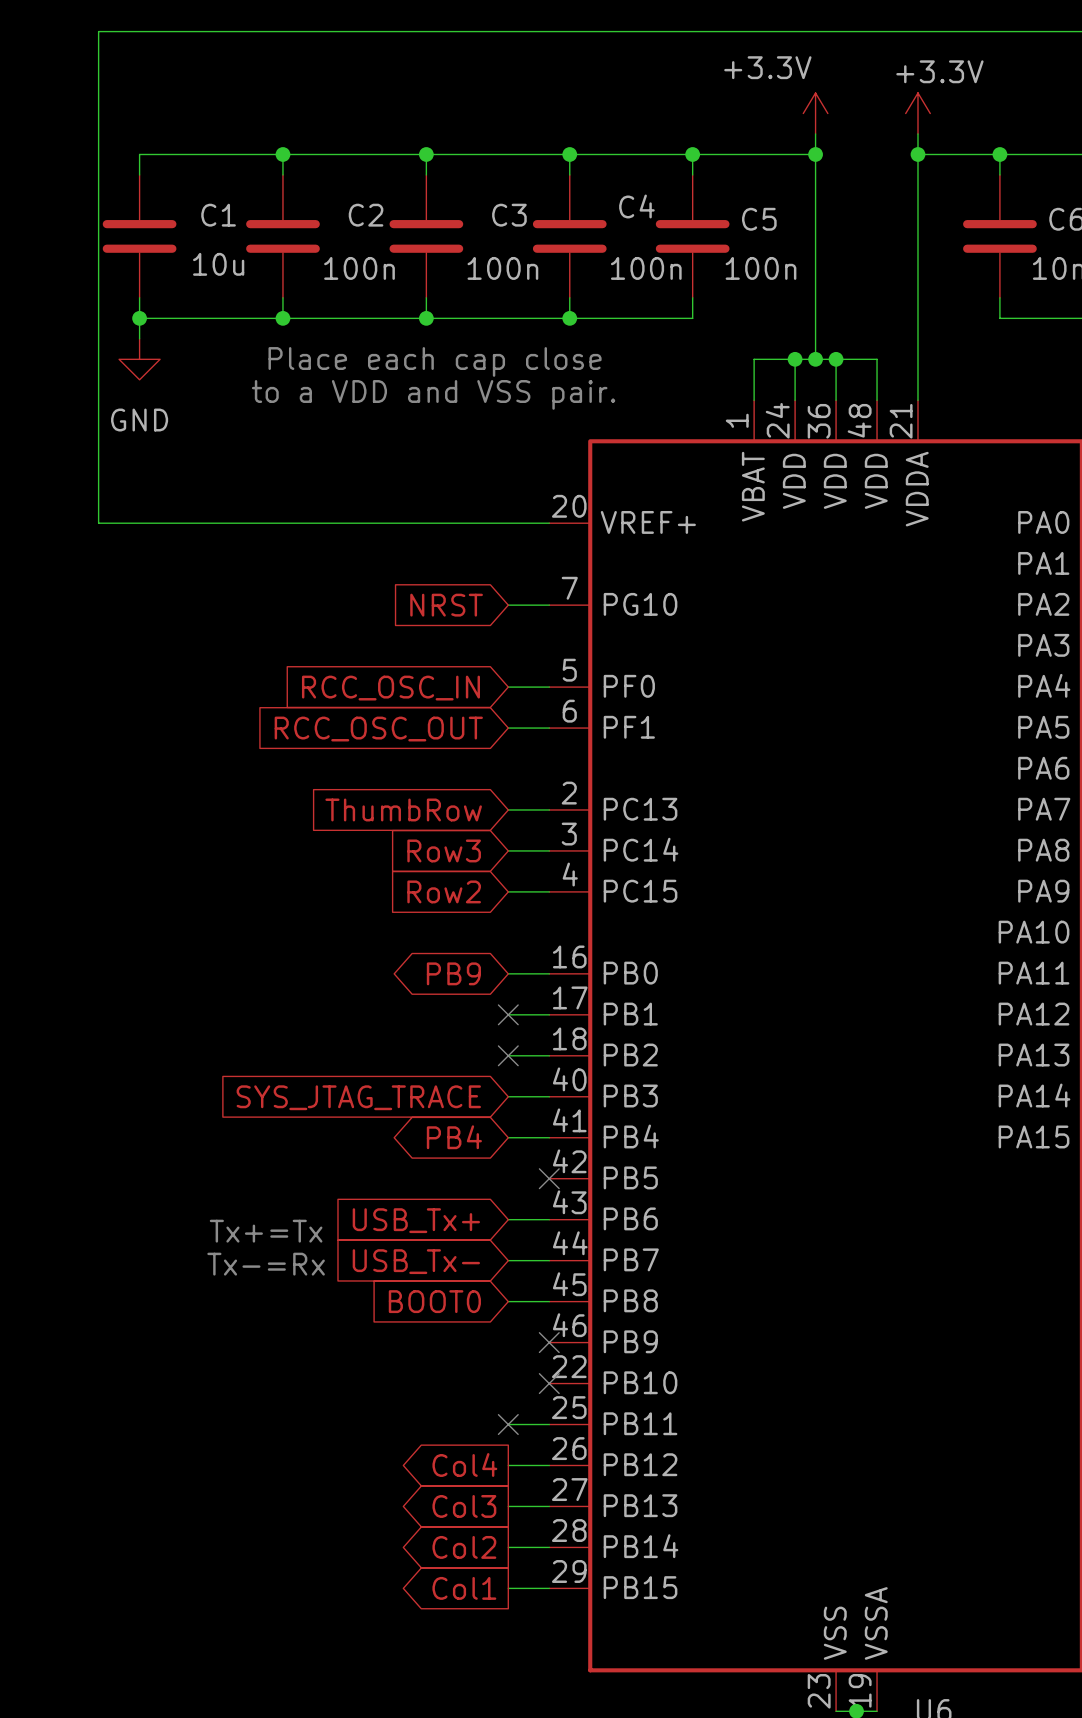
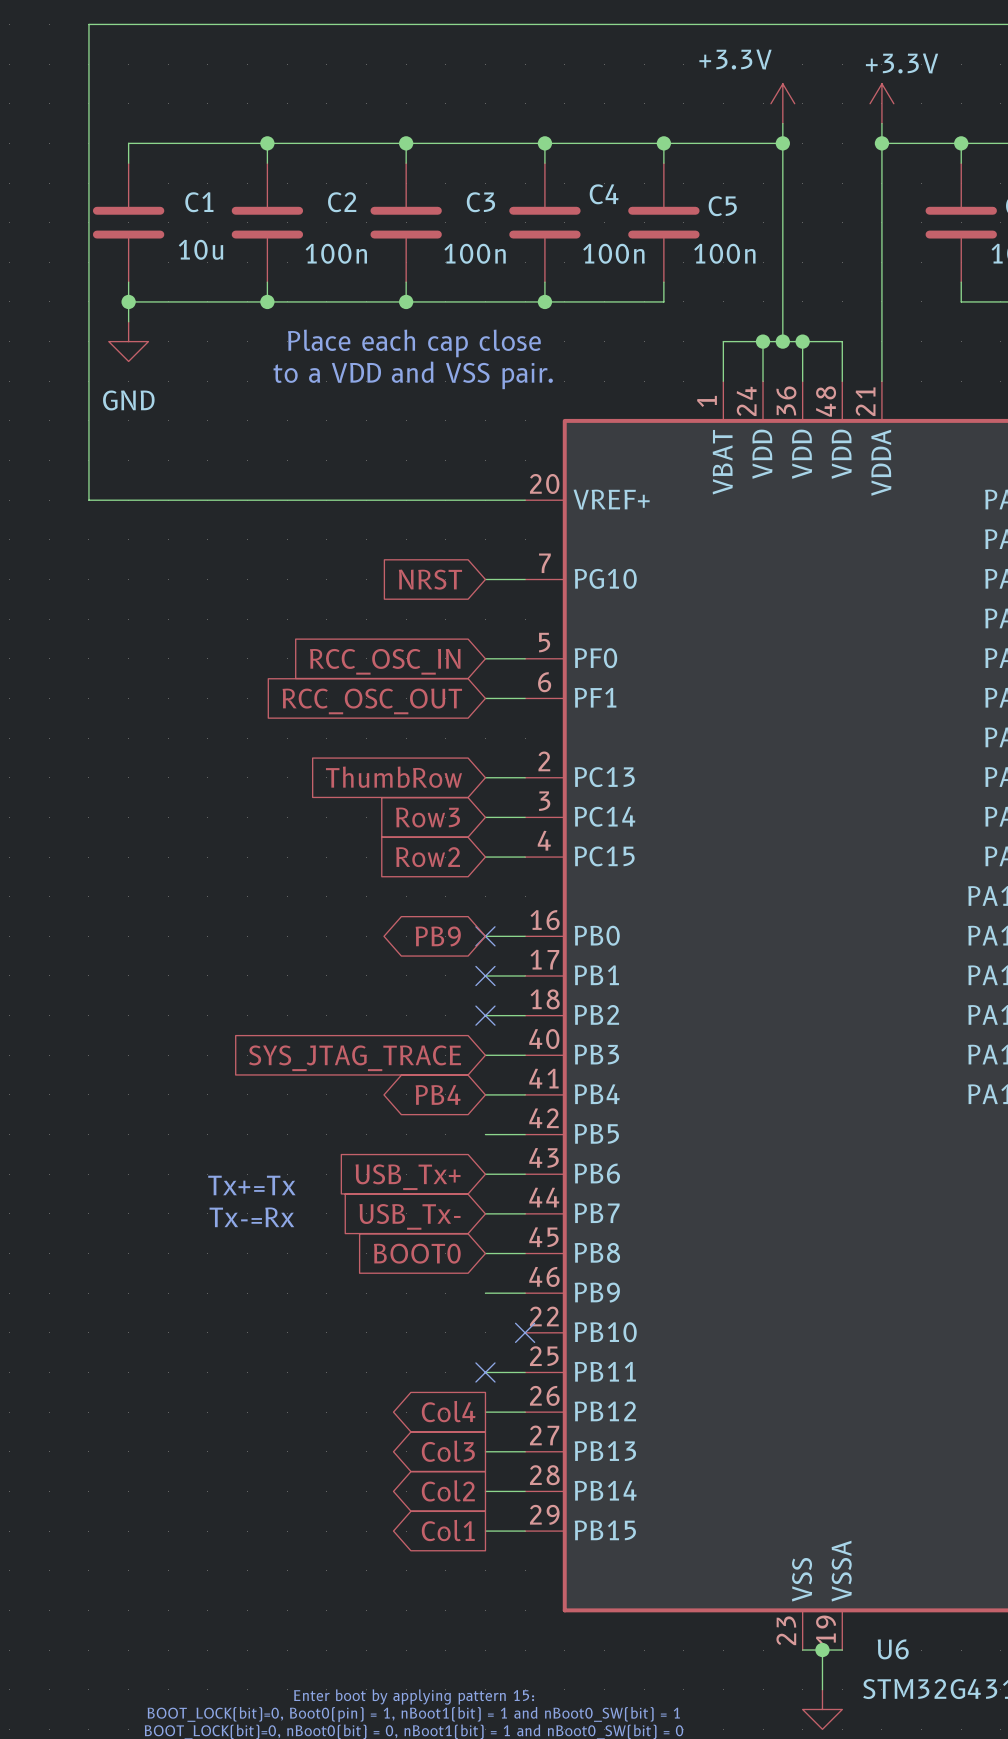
no-connect mark: none -> (485, 936)
wire: none -> (485, 1134) (525, 1134)
no-connect mark: (549, 1178) -> none
wire: none -> (485, 1293) (525, 1293)
no-connect mark: (549, 1342) -> none

